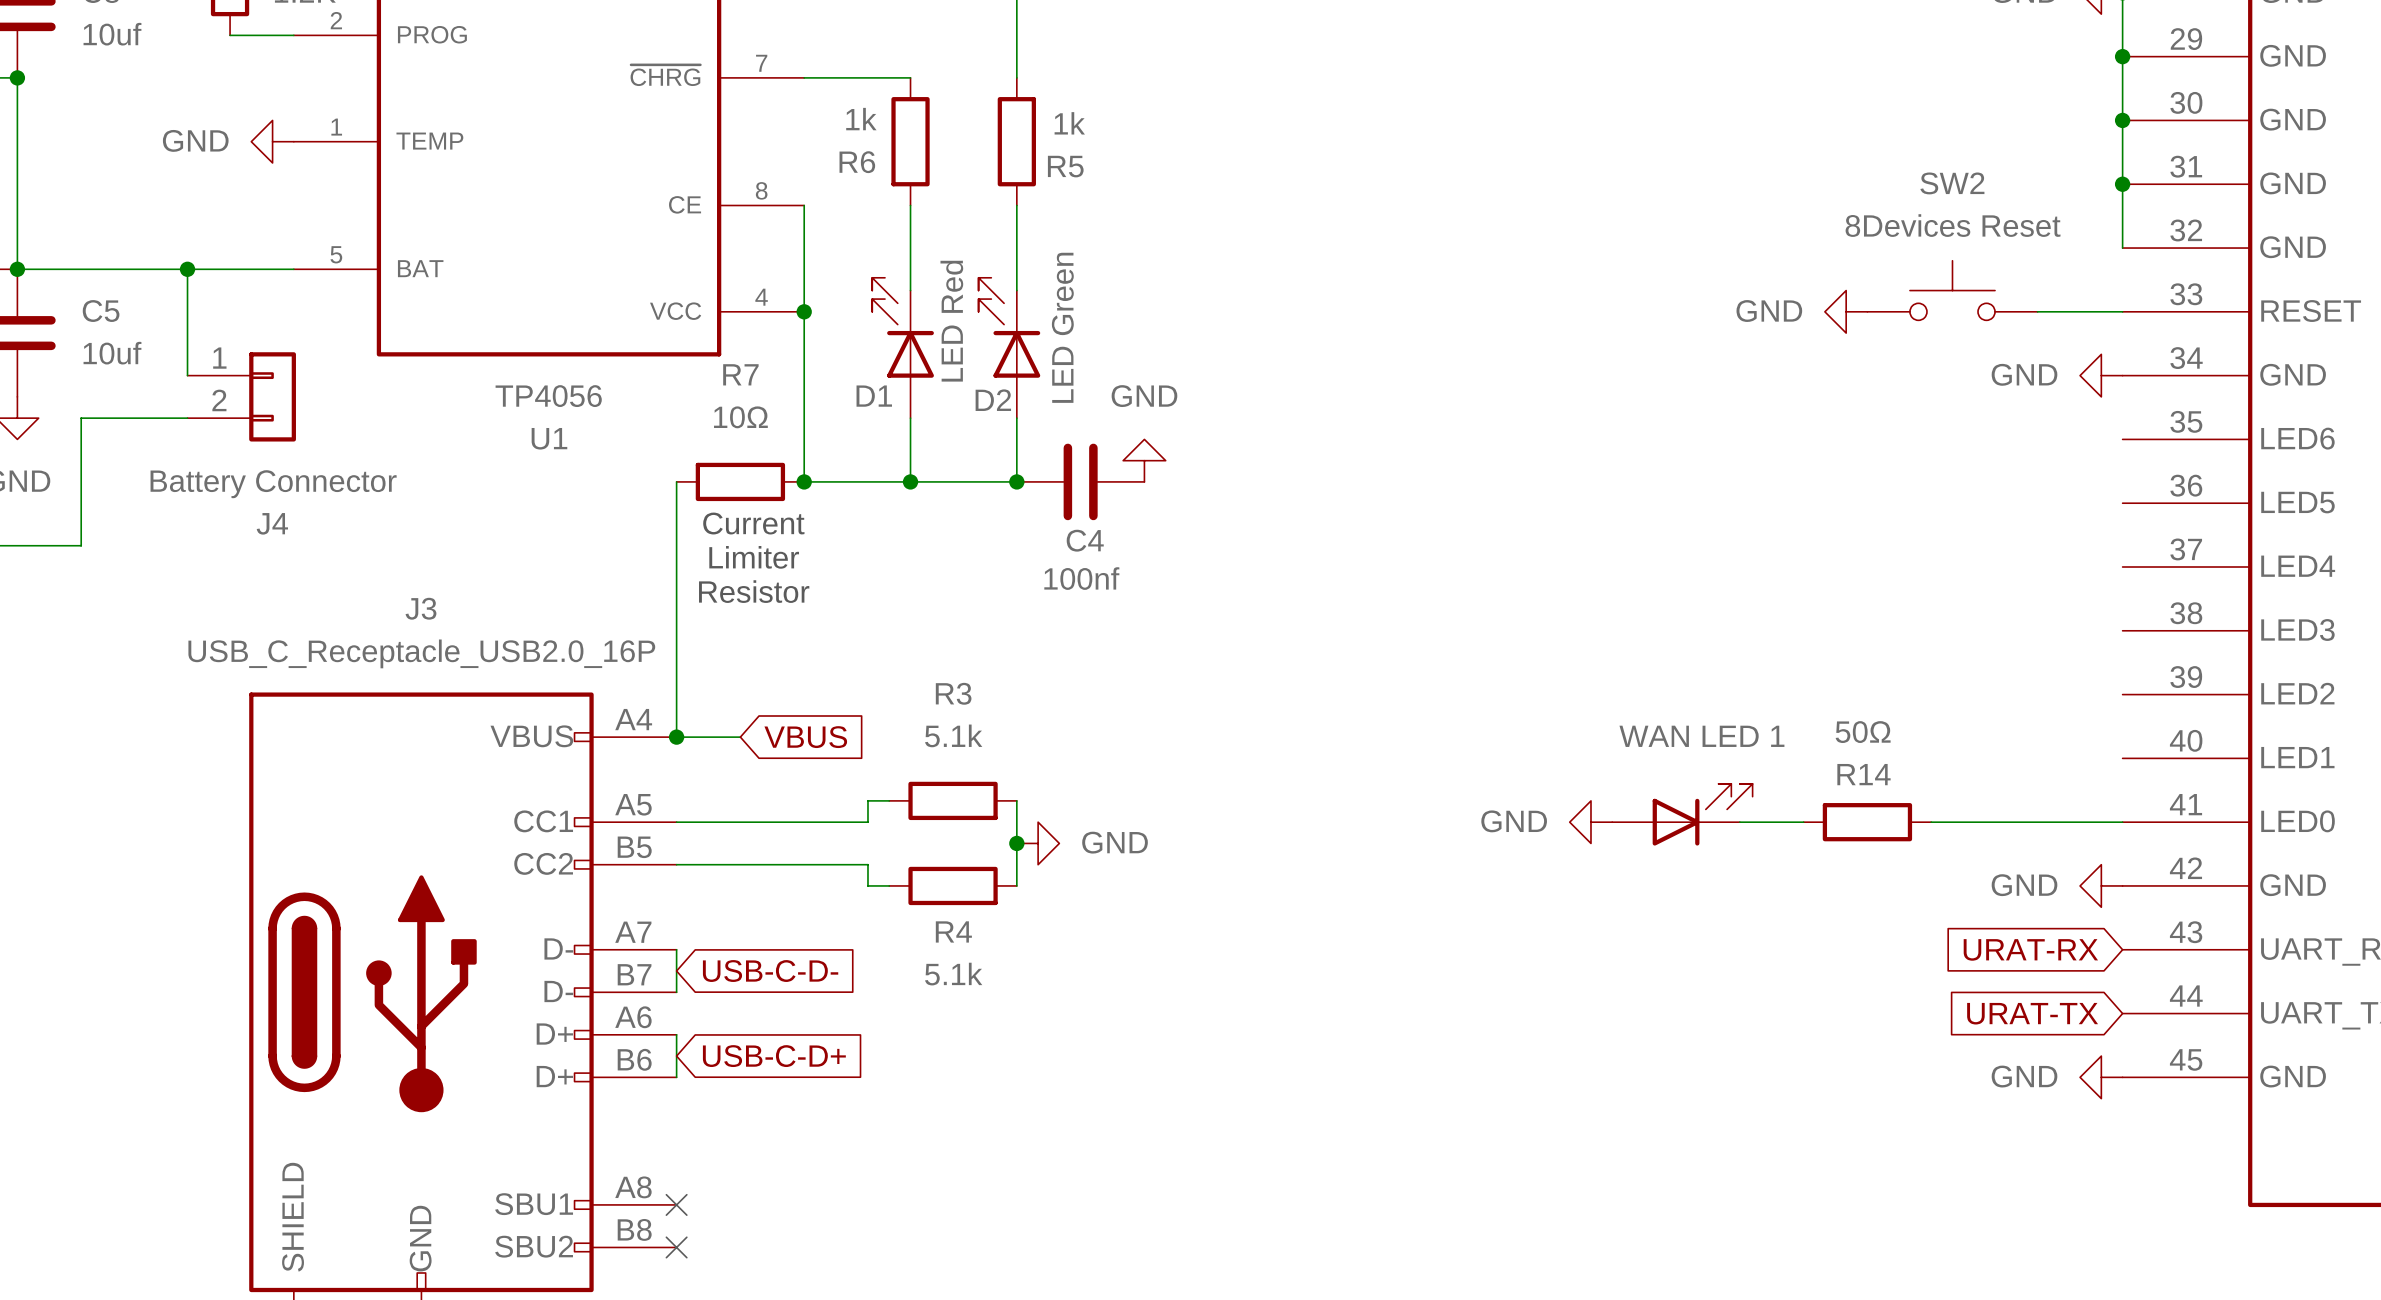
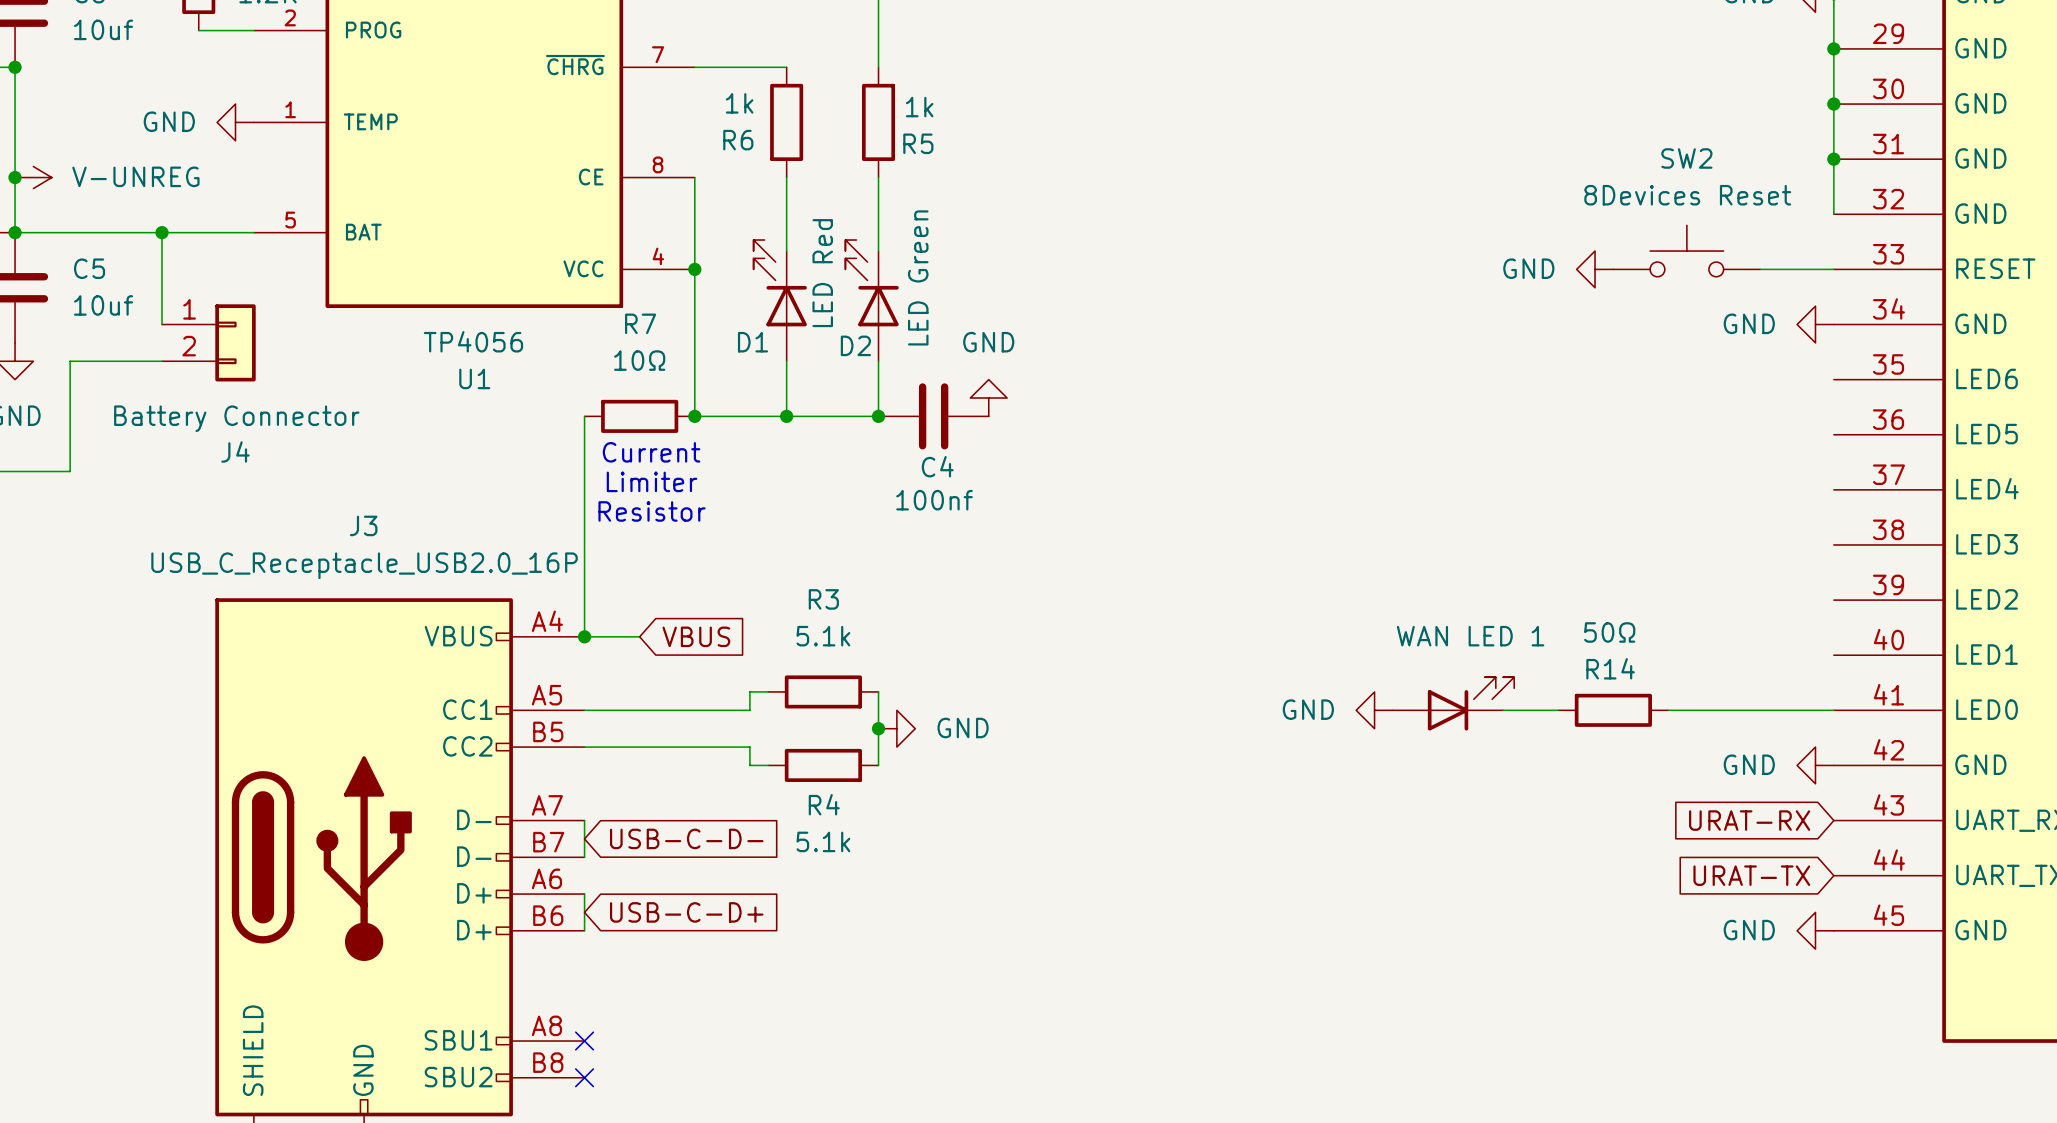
junction: none -> (15, 177)
power symbol: none -> V-UNREG (33, 177)

